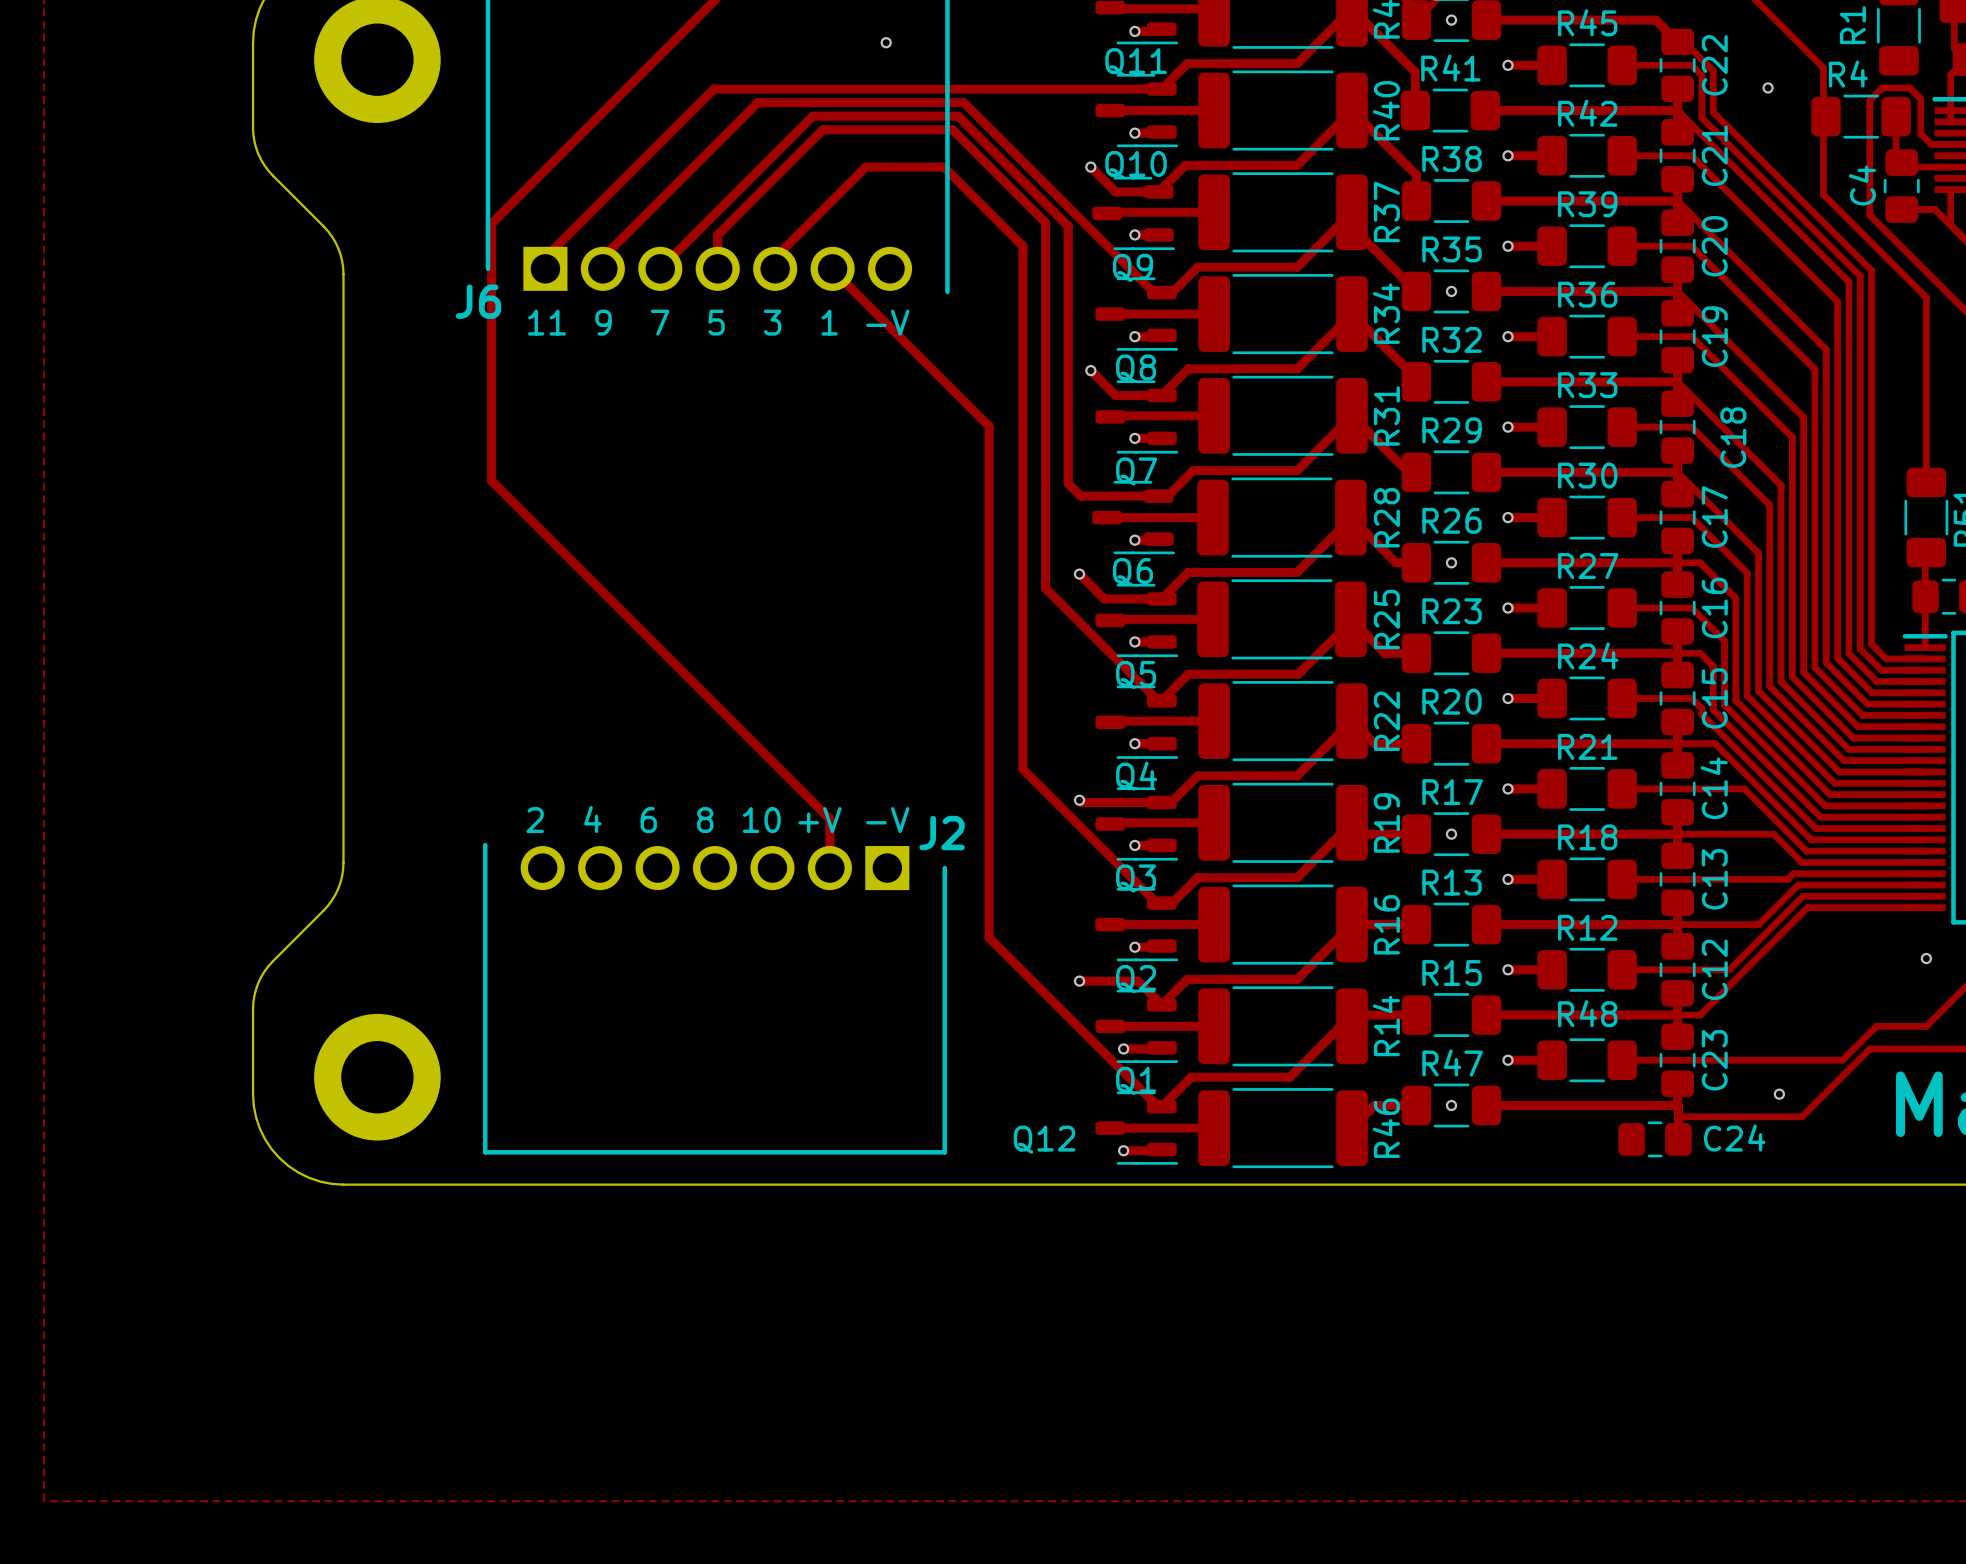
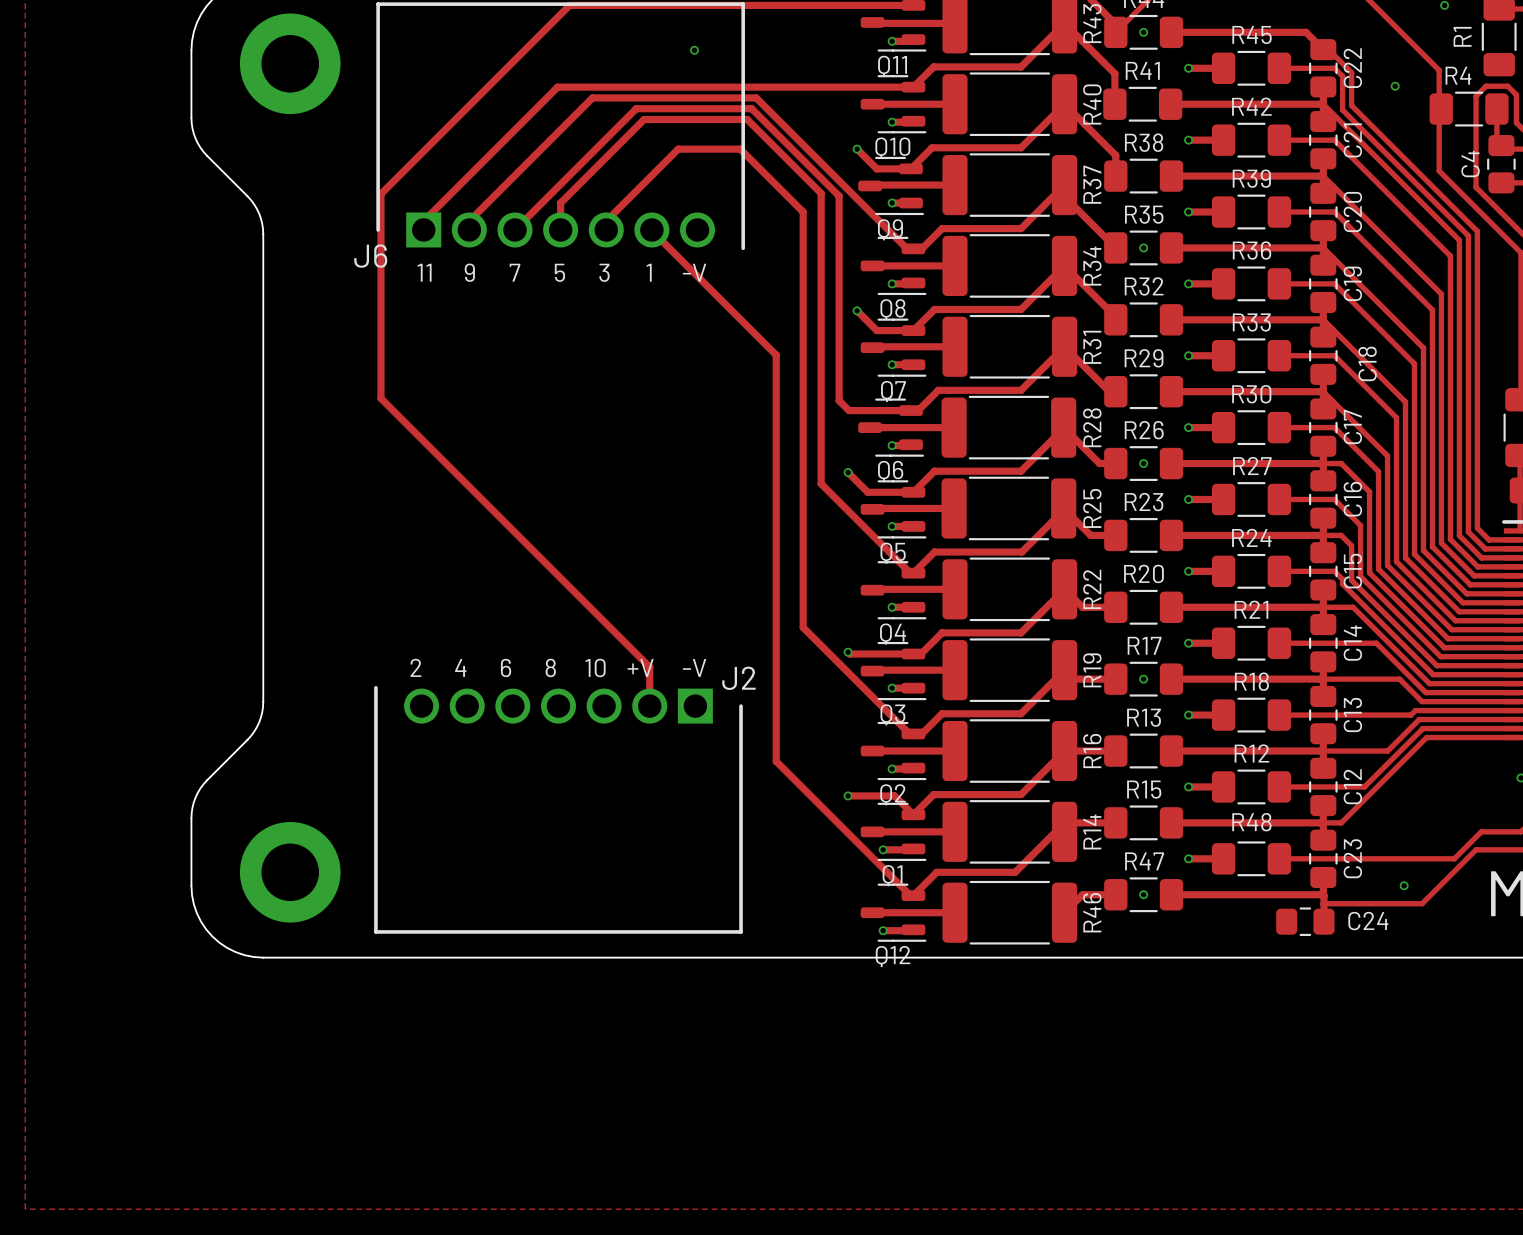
Q12 name position: Q12 (1044, 1139) -> Q12 (893, 956)

